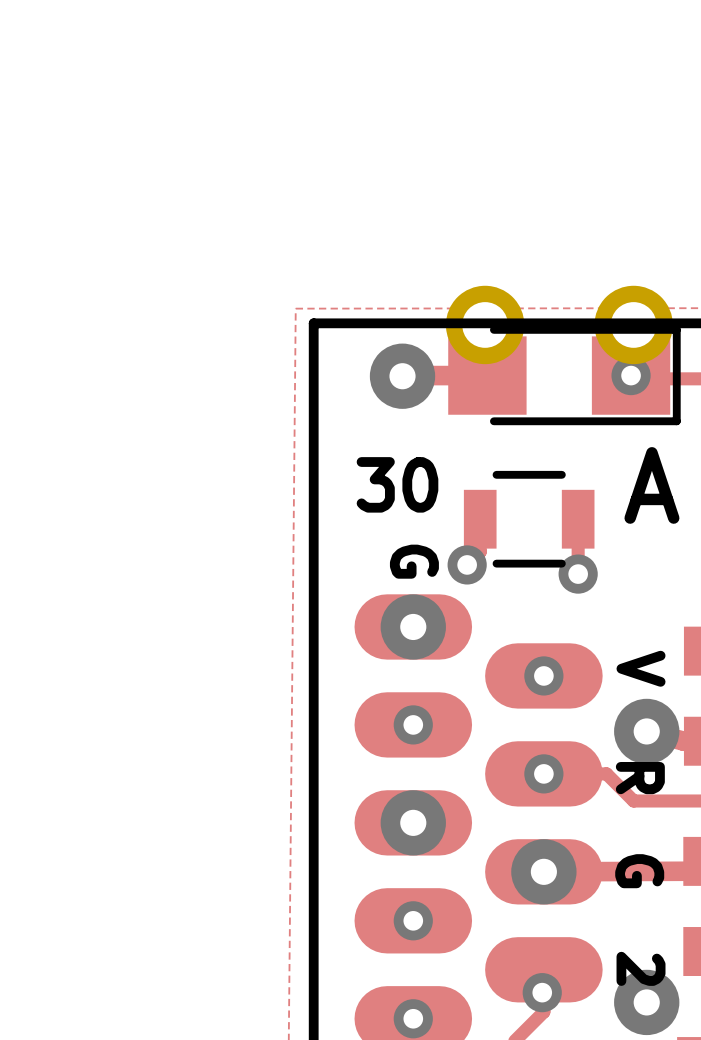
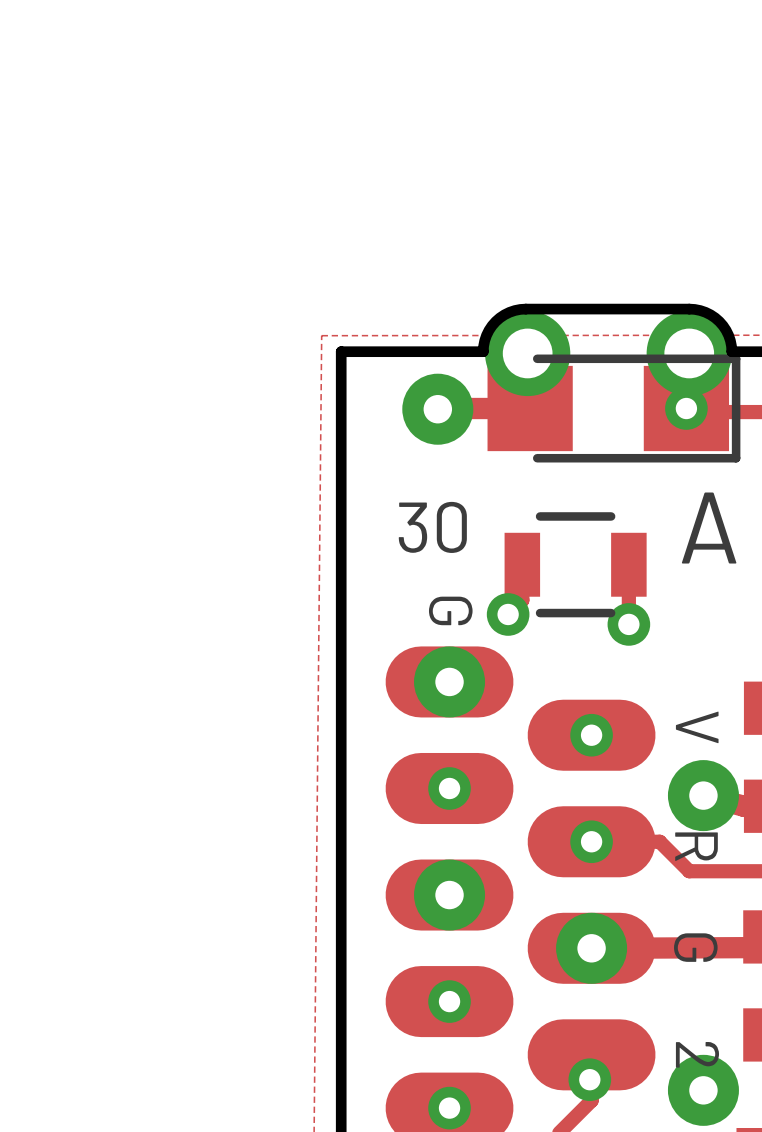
board edge: (444, 323) (672, 323) -> (483, 351) (486, 335) (495, 321) (509, 312) (525, 309) (700, 310) (715, 317) (723, 325) (728, 335) (731, 351)

